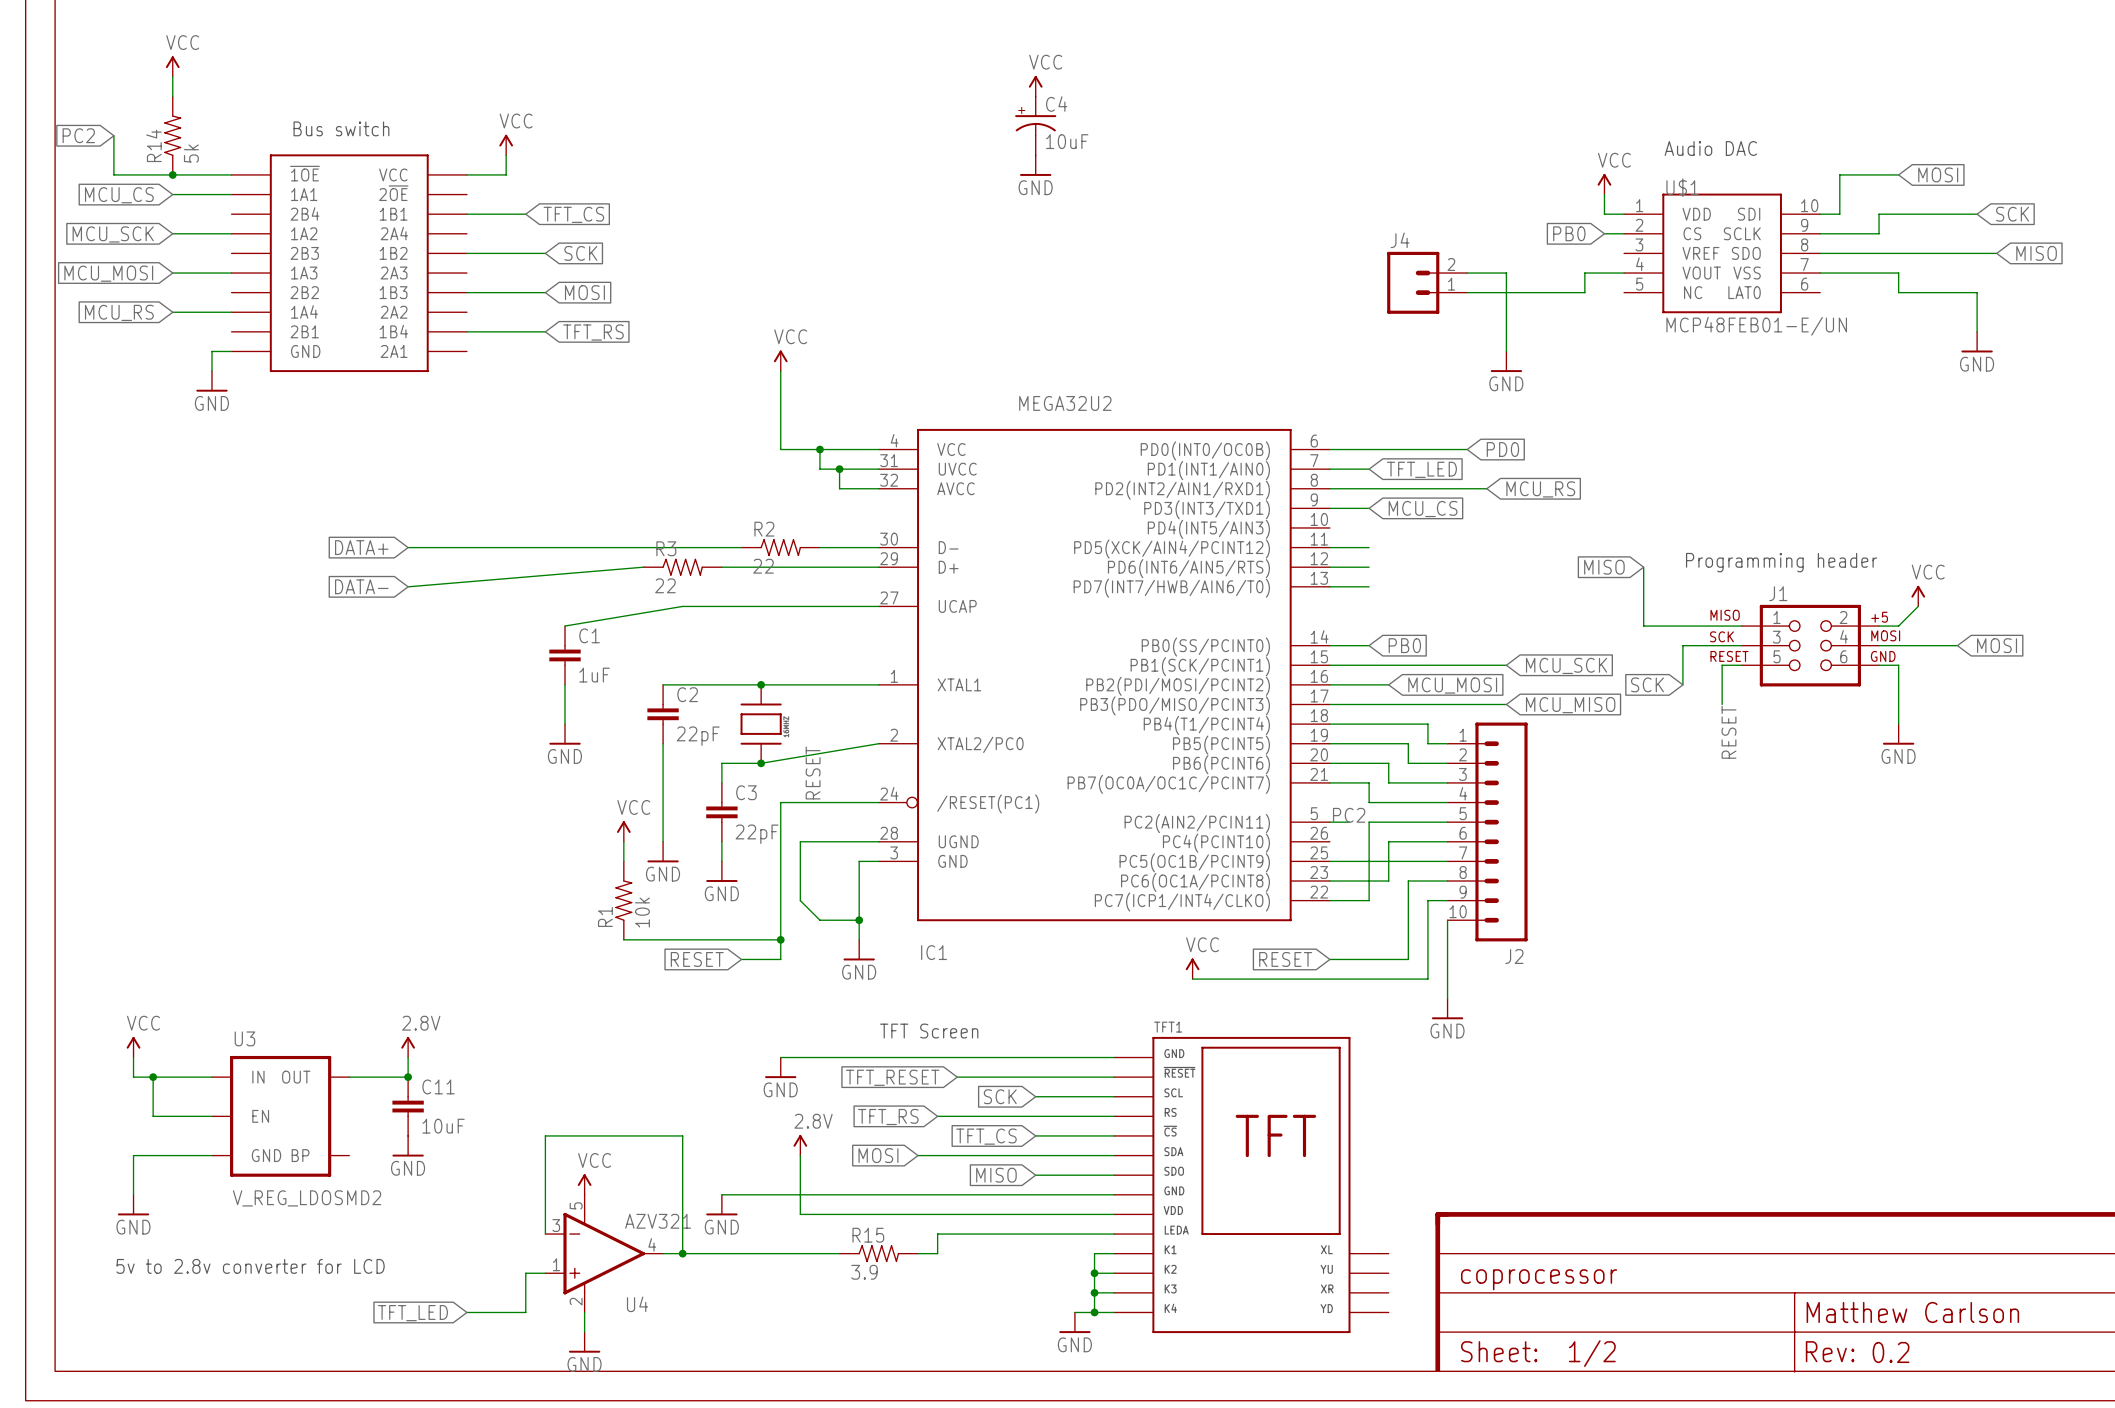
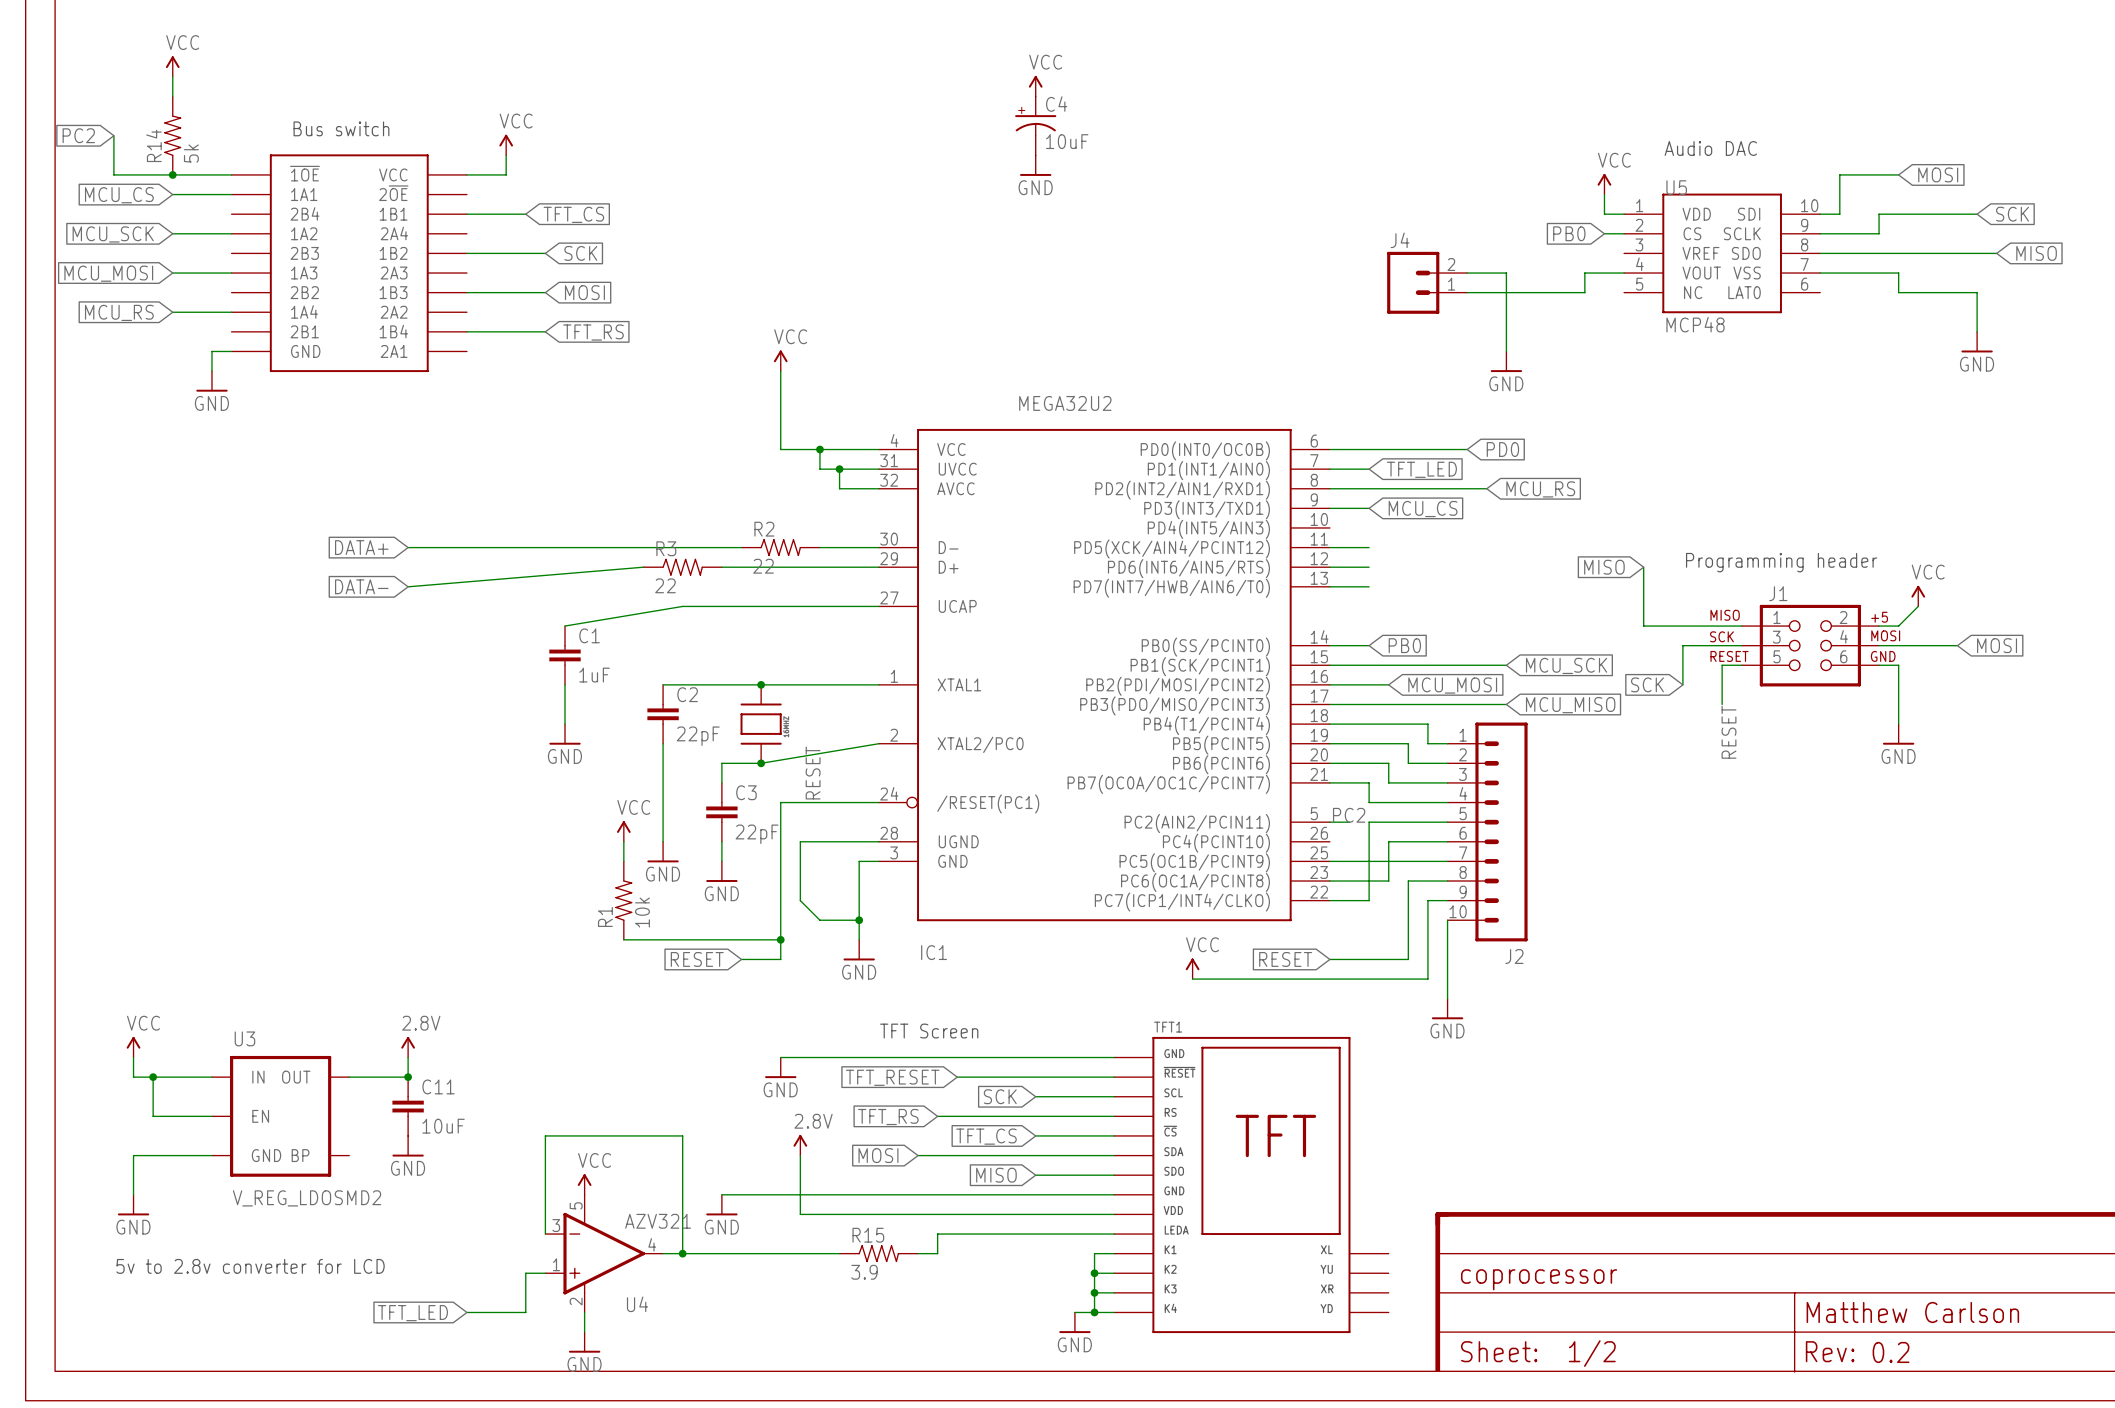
U$1 name: U$1 (1682, 187) -> U5 (1676, 187)
U$1 value: MCP48FEB01-E/UN (1756, 326) -> MCP48 (1695, 324)

